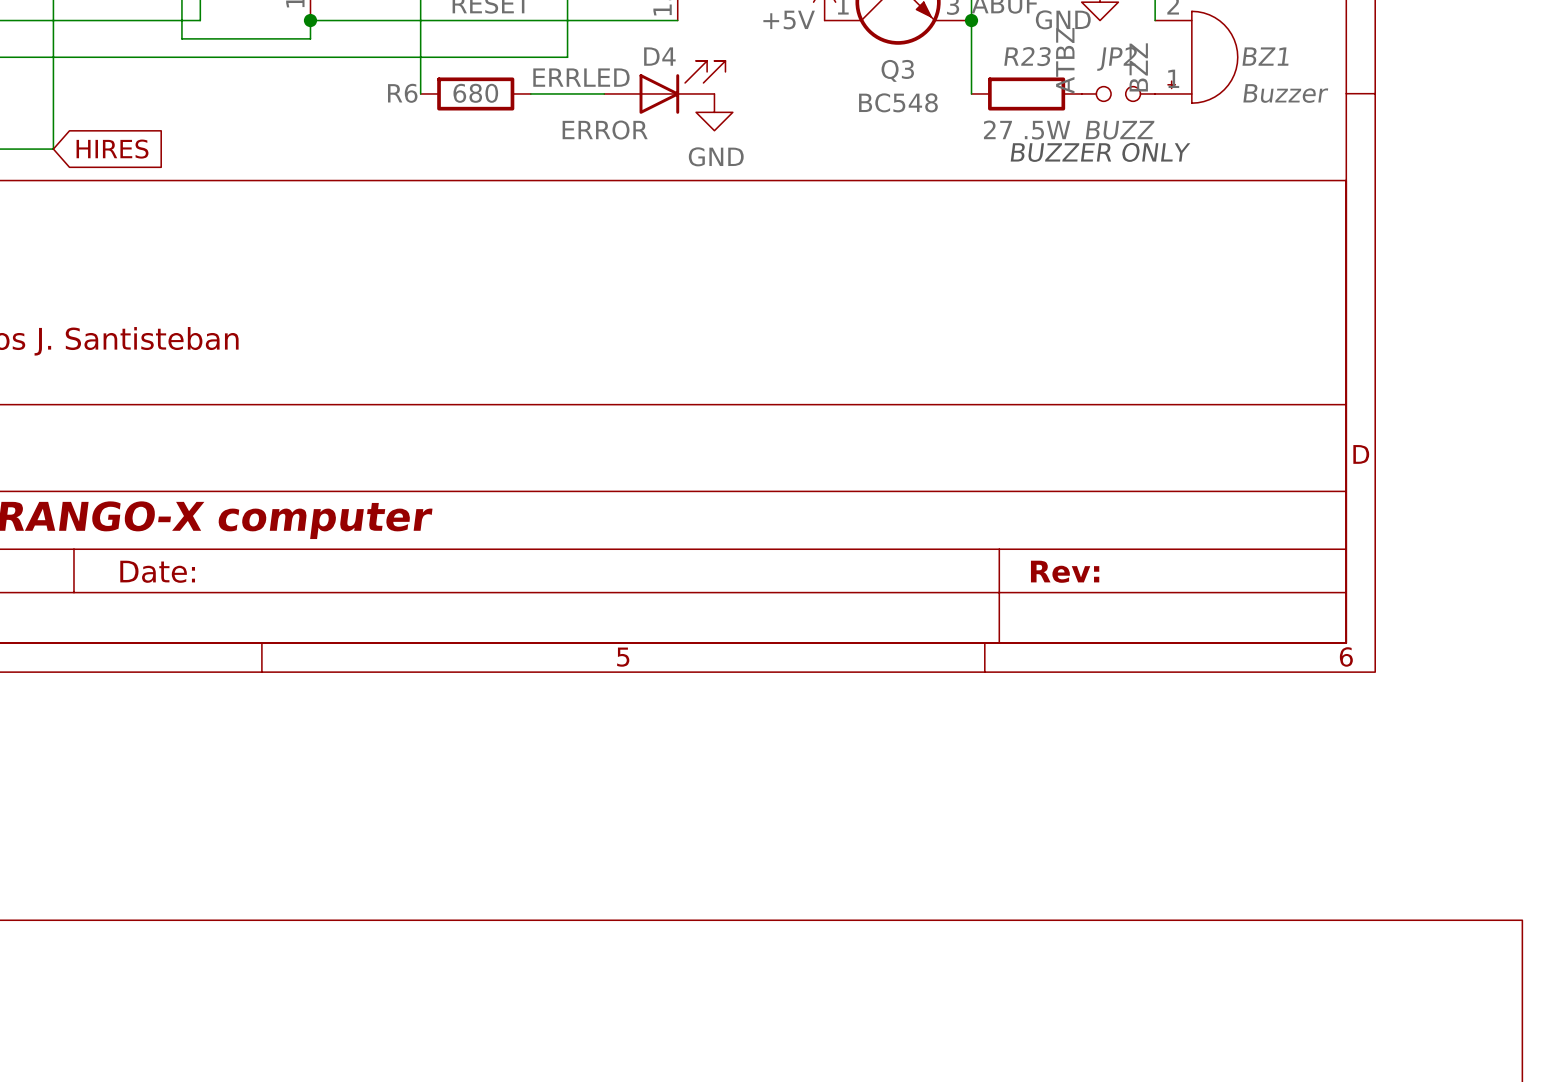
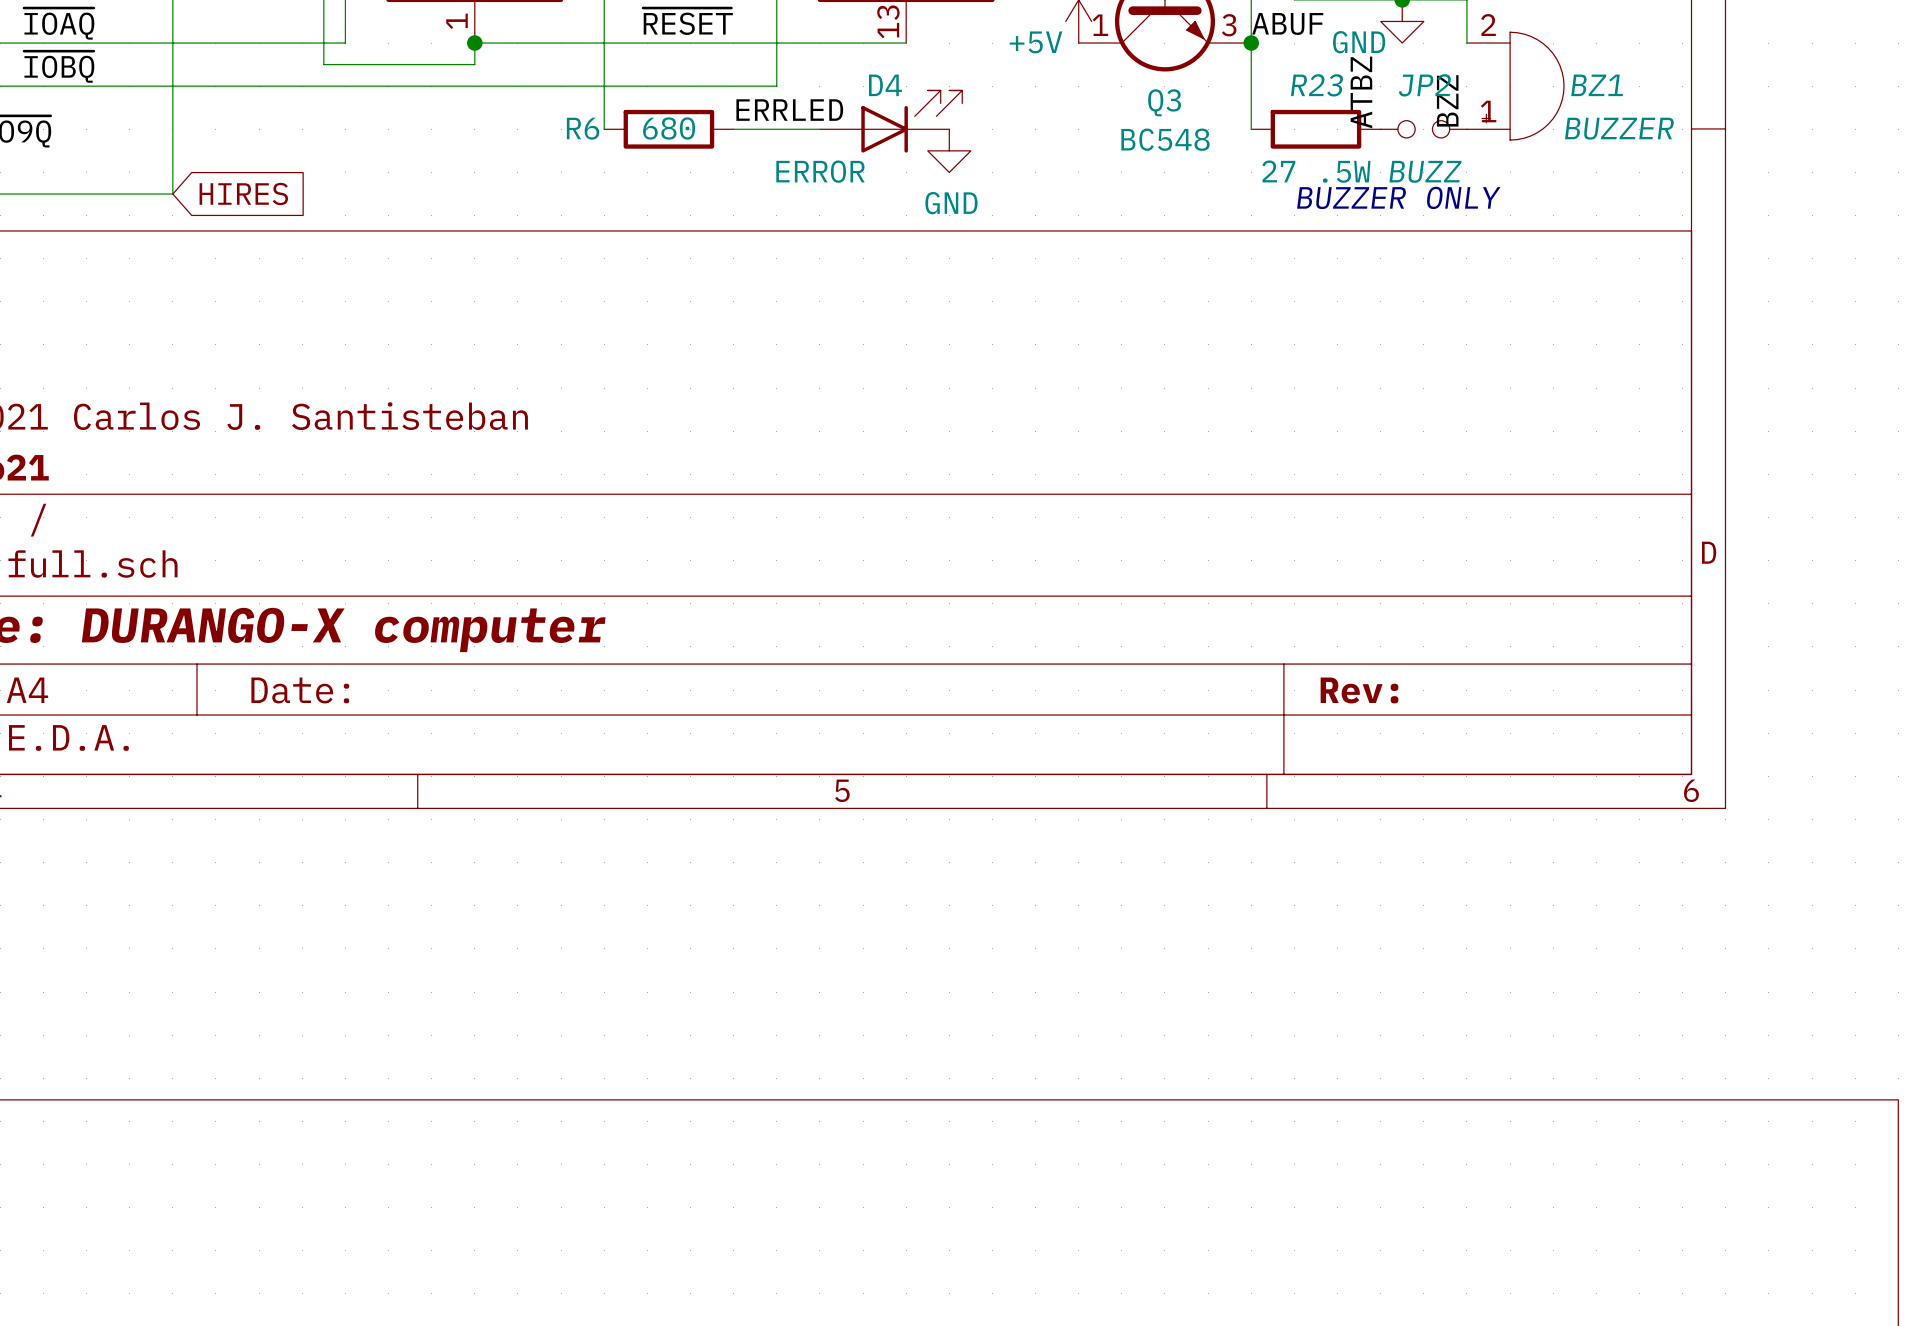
BZ1 value: Buzzer (1285, 93) -> BUZZER (1619, 128)

